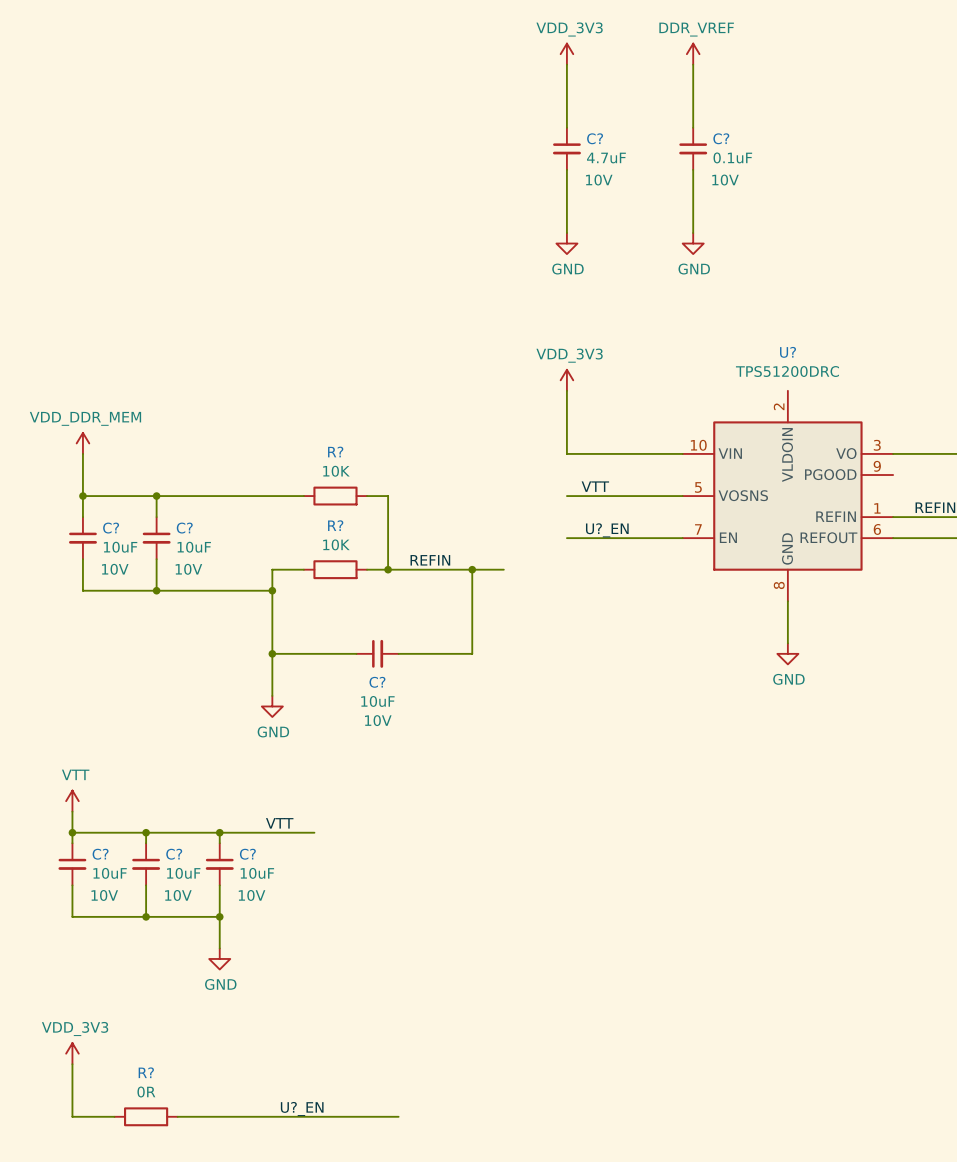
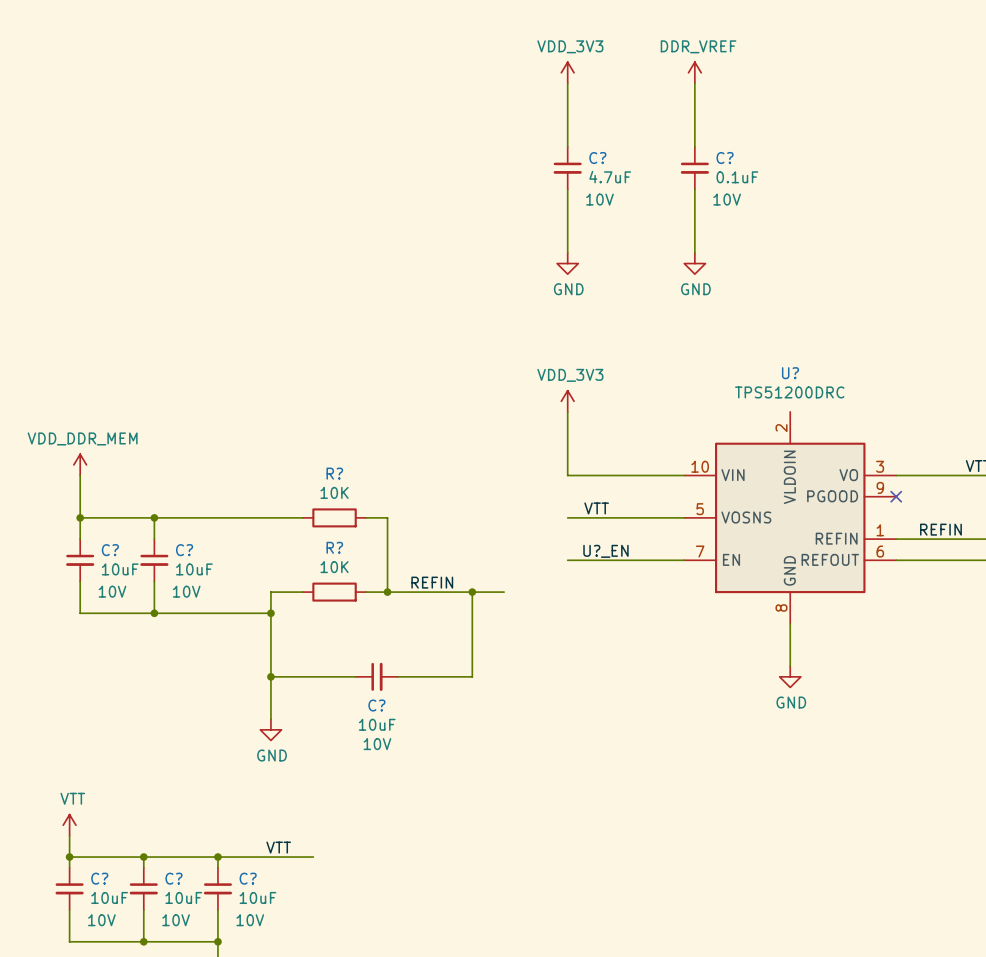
no-connect mark: none -> (896, 496)

